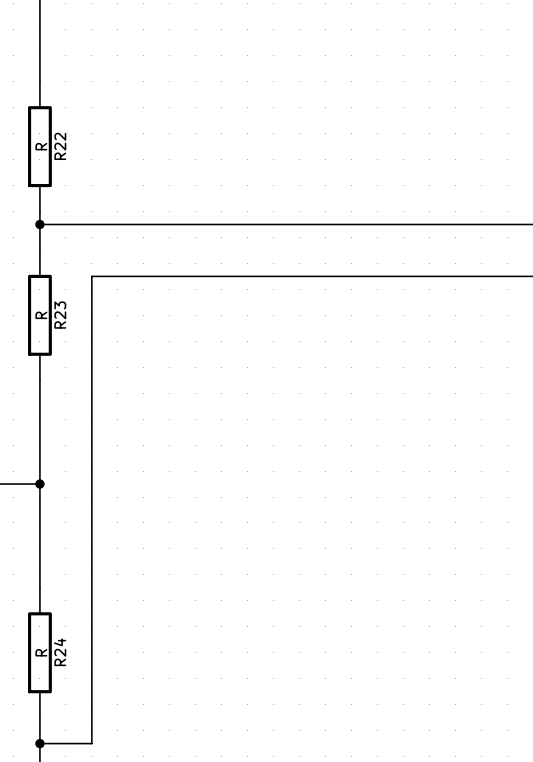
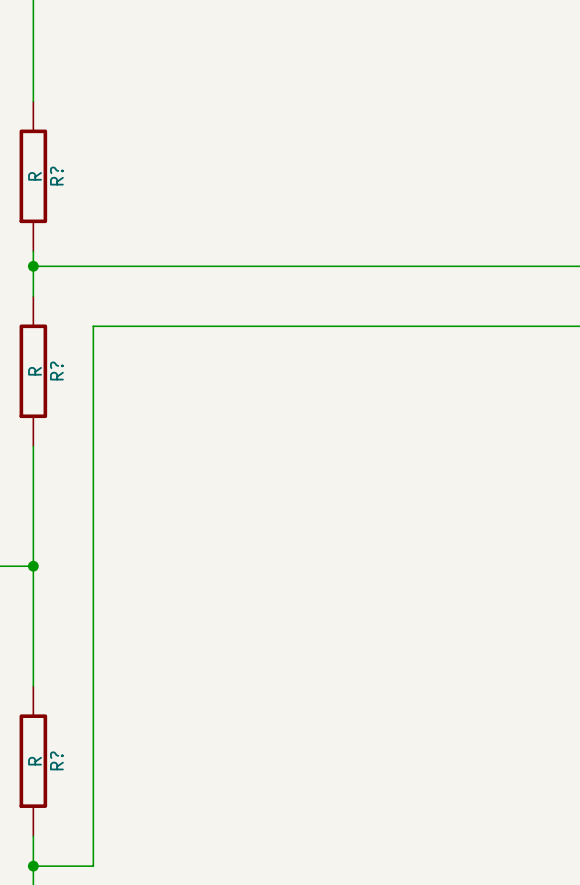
R22 name: R22 (60, 146) -> R? (56, 176)
R23 name: R23 (60, 315) -> R? (56, 370)
R24 name: R24 (60, 652) -> R? (56, 760)

